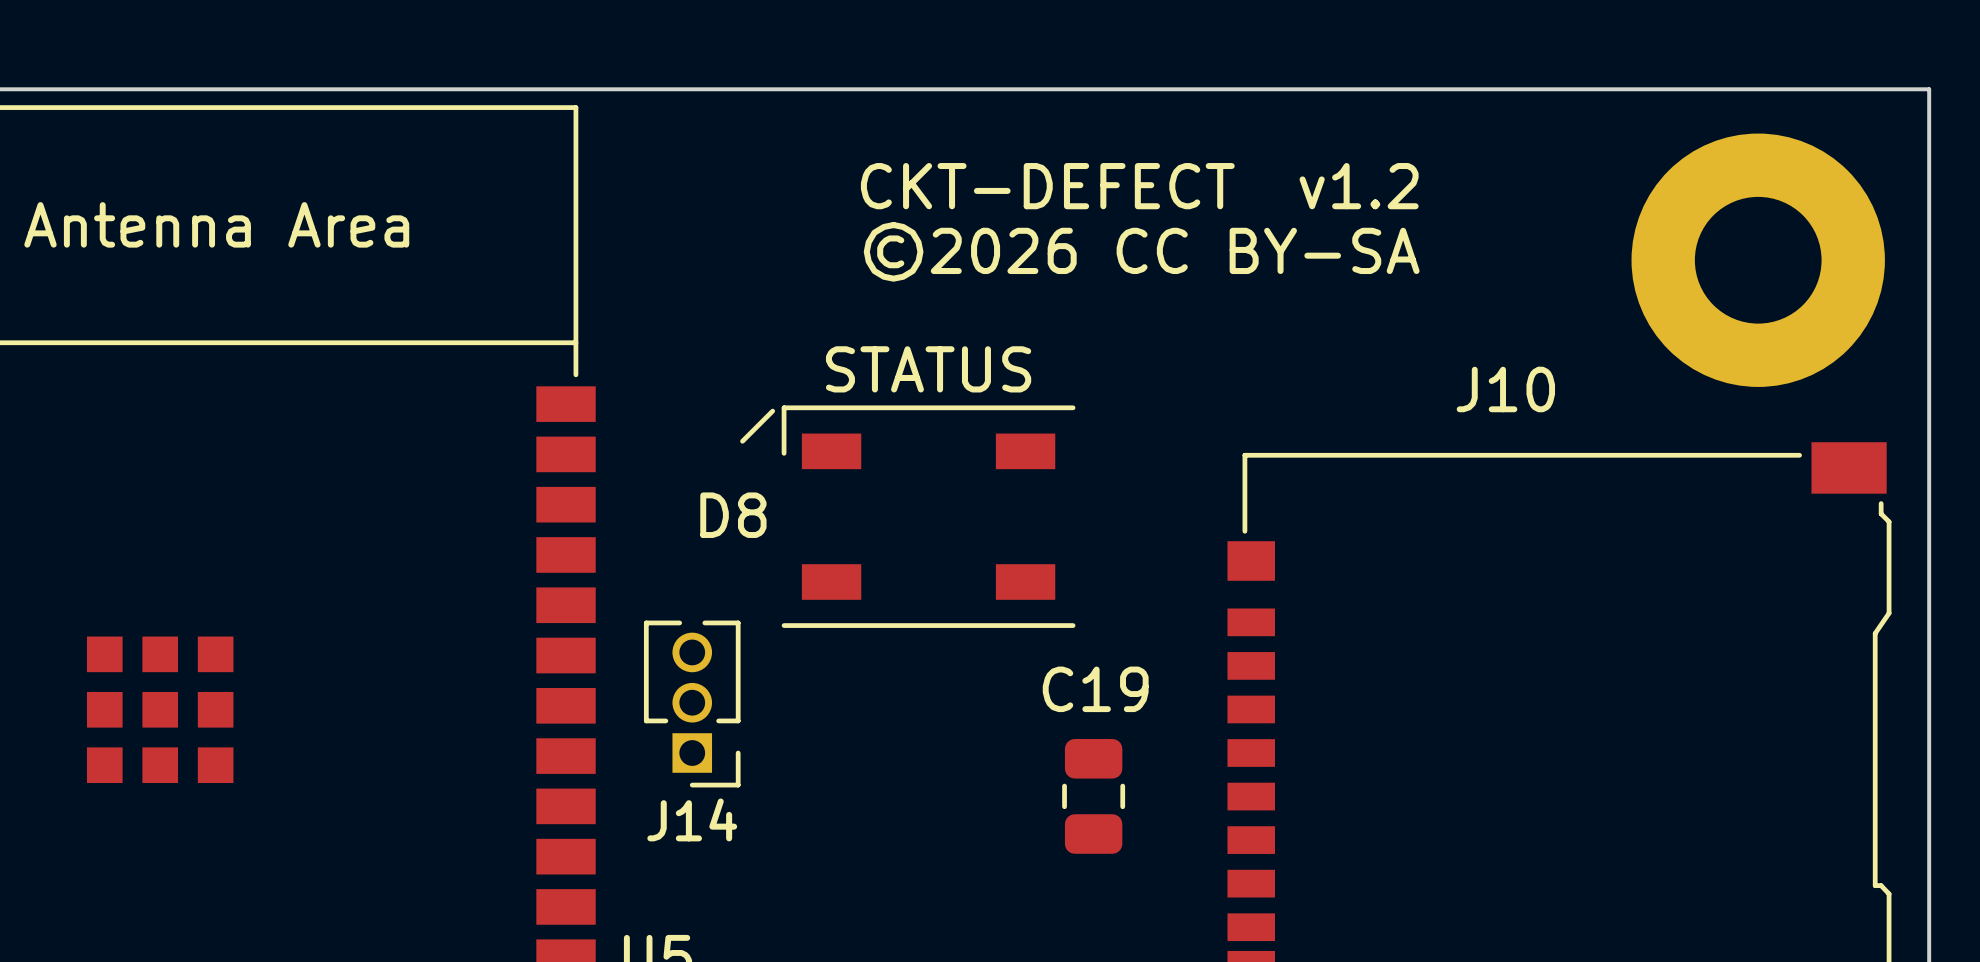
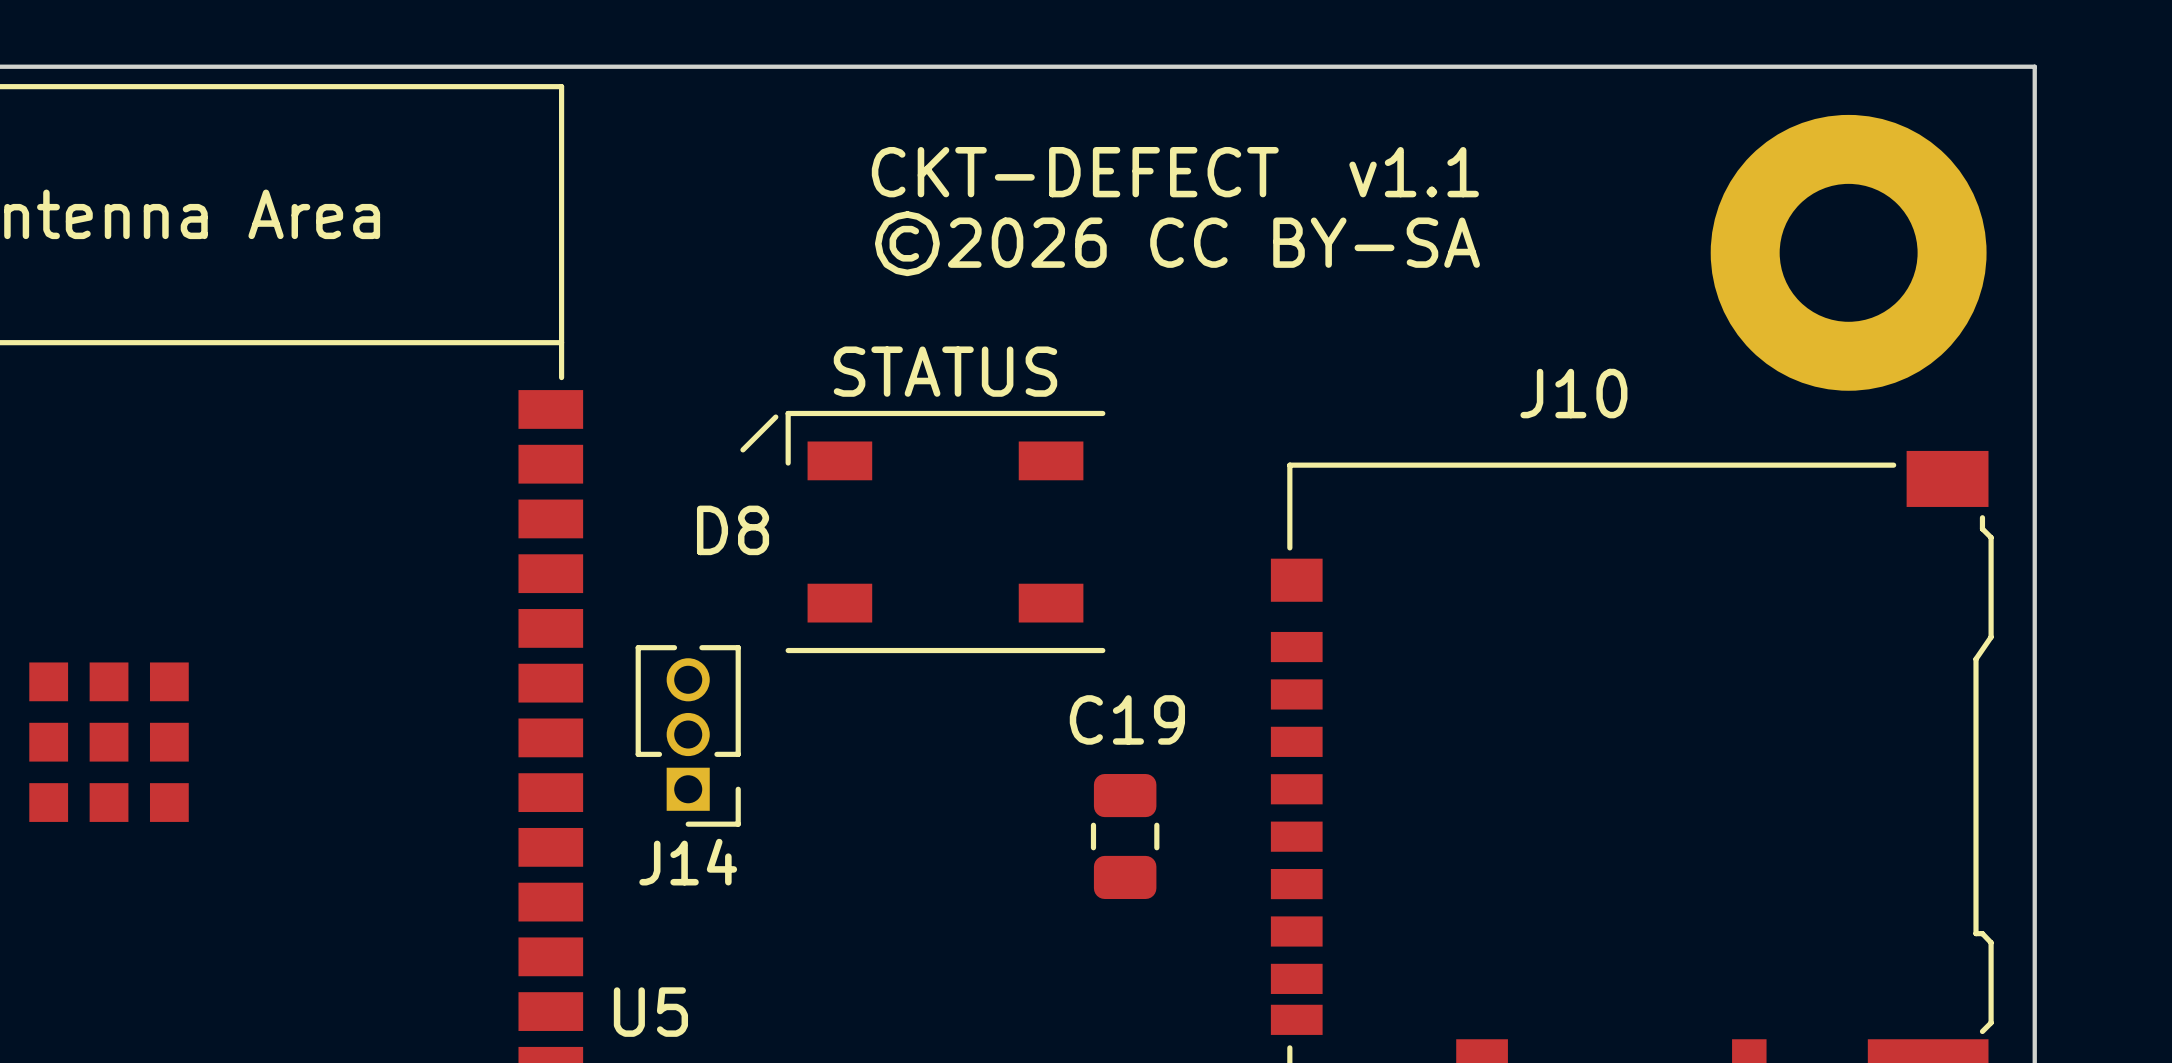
text: CKT-DEFECT v1.2 (1139, 186) -> CKT-DEFECT v1.1 (1175, 172)

